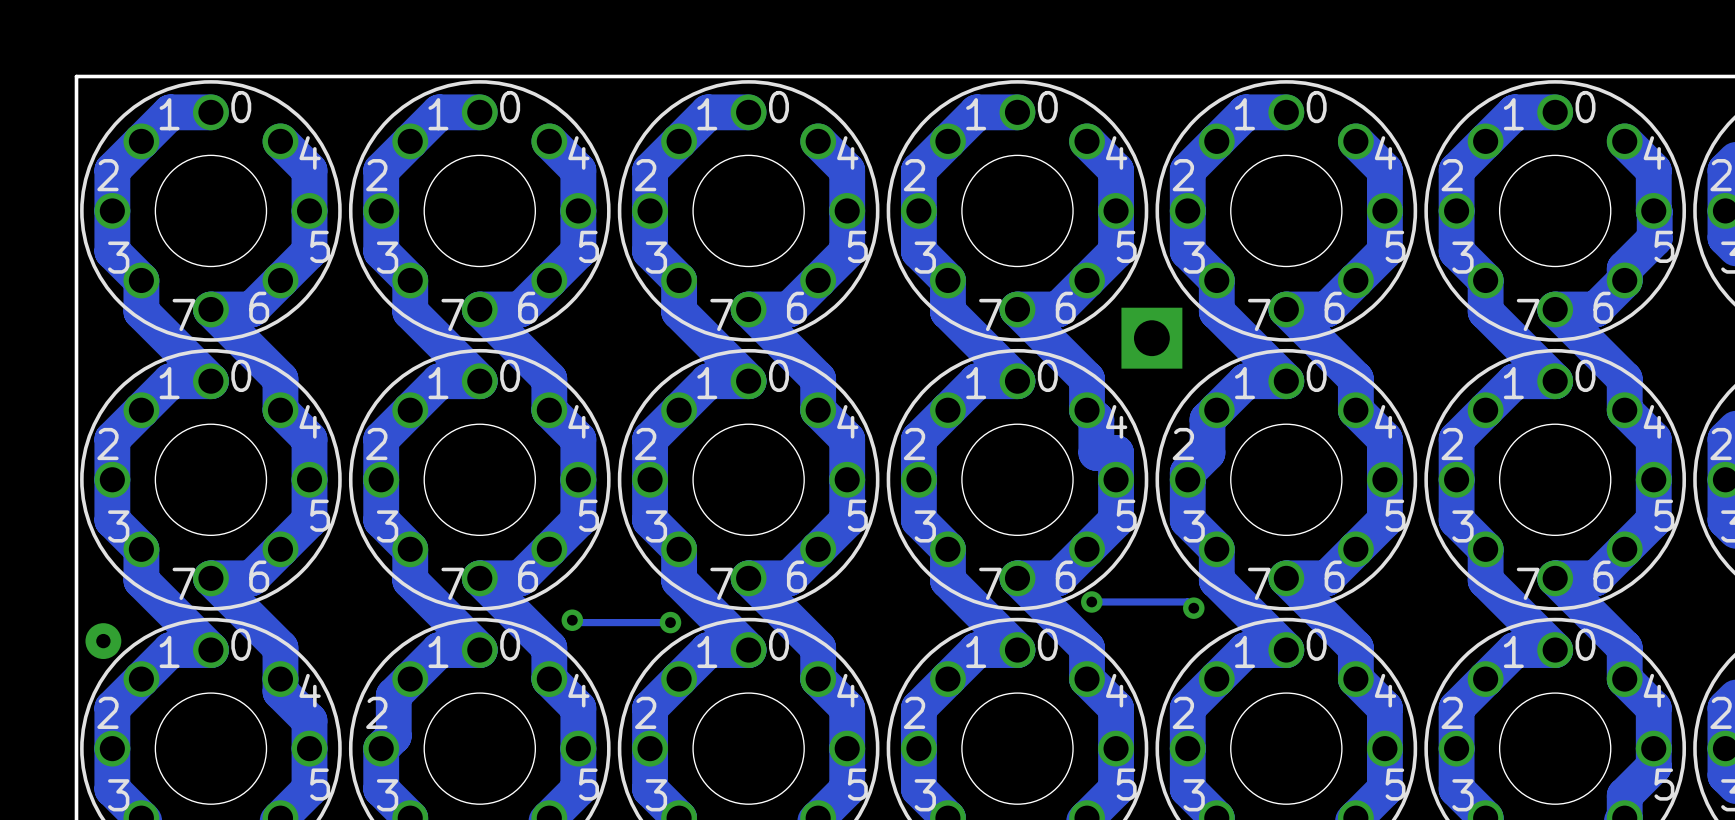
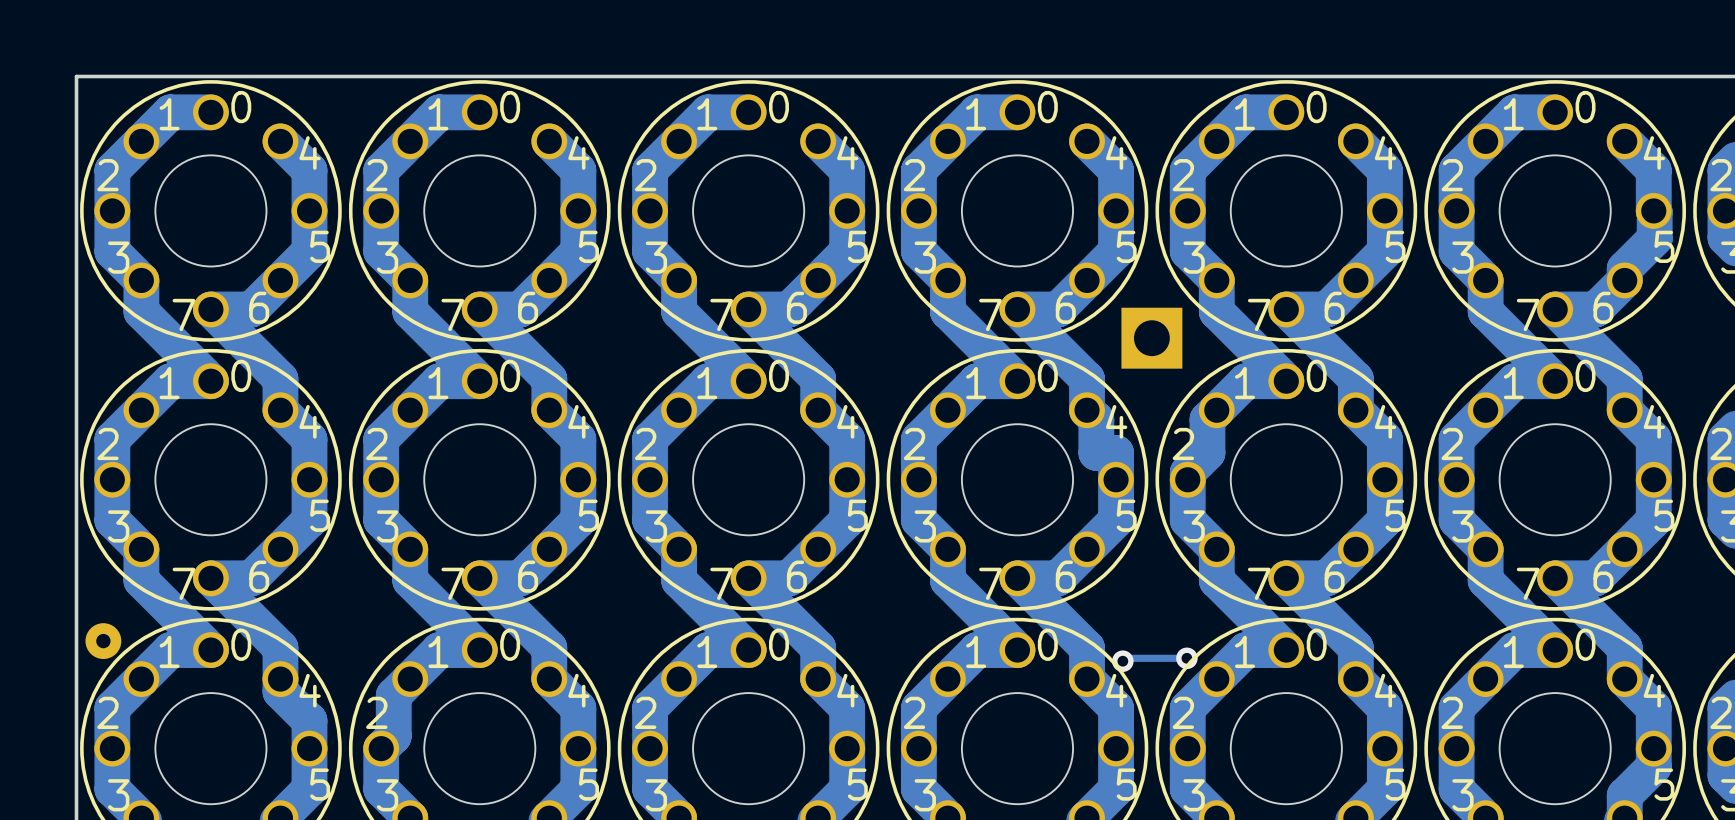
track: (1091, 601) (1187, 601) (1193, 608) -> none
via: (1091, 601) -> none
via: (1193, 608) -> none
track: (572, 620) (574, 622) (670, 622) -> none
via: (572, 620) -> none
via: (670, 622) -> none
track: none -> (1186, 658) (1125, 658) (1122, 661)
via: none -> (1186, 658)
via: none -> (1122, 661)

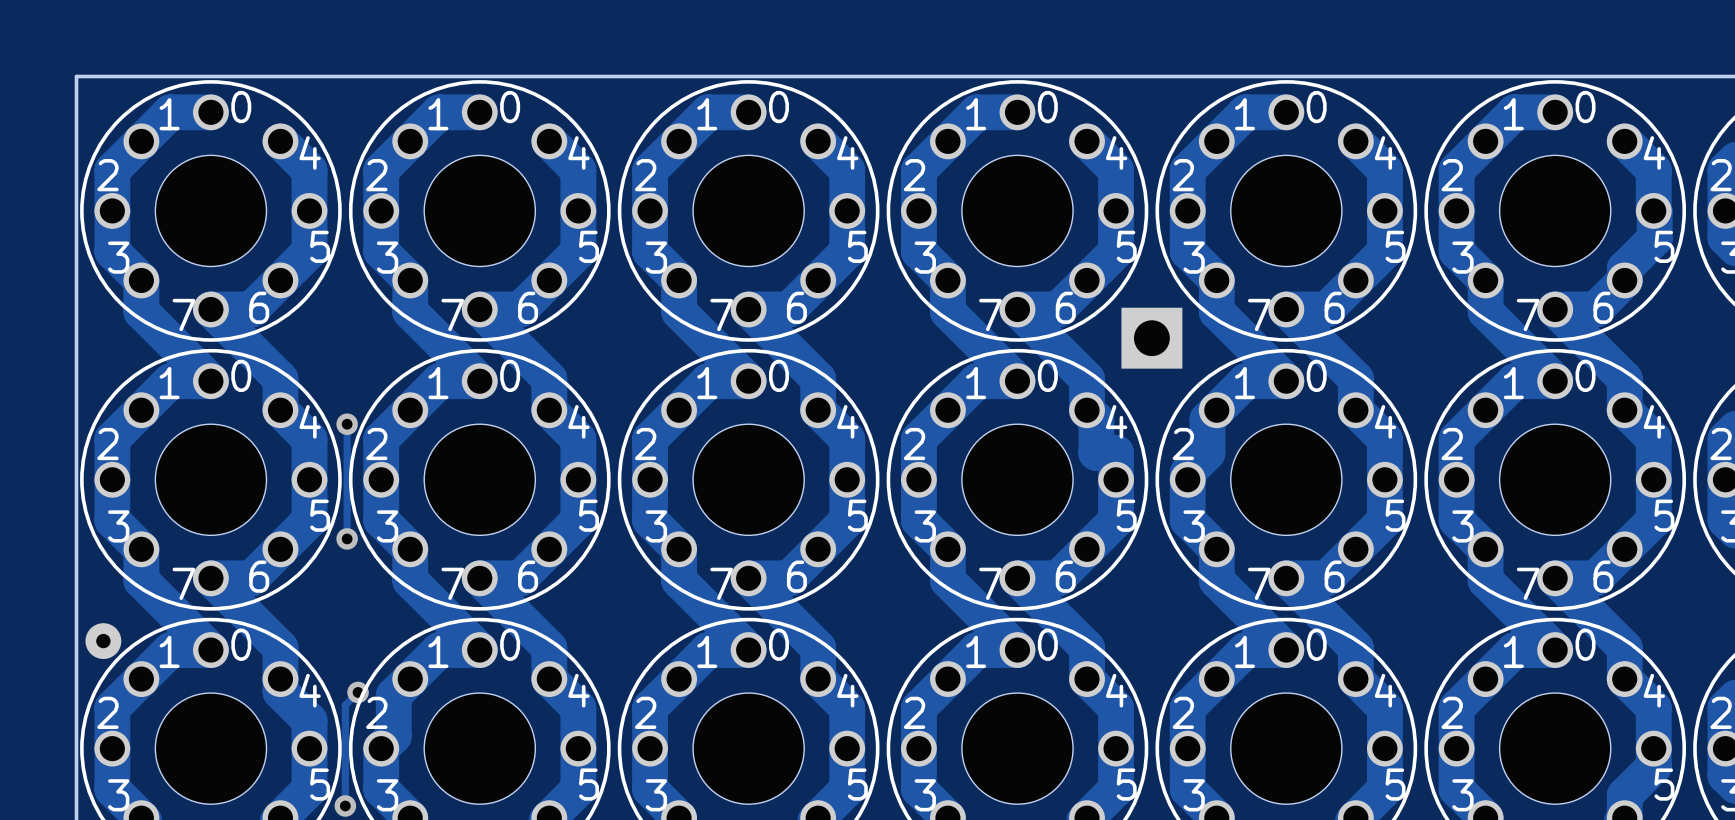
track: none -> (347, 424) (347, 538)
via: none -> (347, 424)
via: none -> (347, 538)
track: (1186, 658) (1125, 658) (1122, 661) -> none
via: (1186, 658) -> none
via: (1122, 661) -> none
track: none -> (358, 692) (345, 705) (345, 805)
via: none -> (358, 692)
via: none -> (345, 805)

